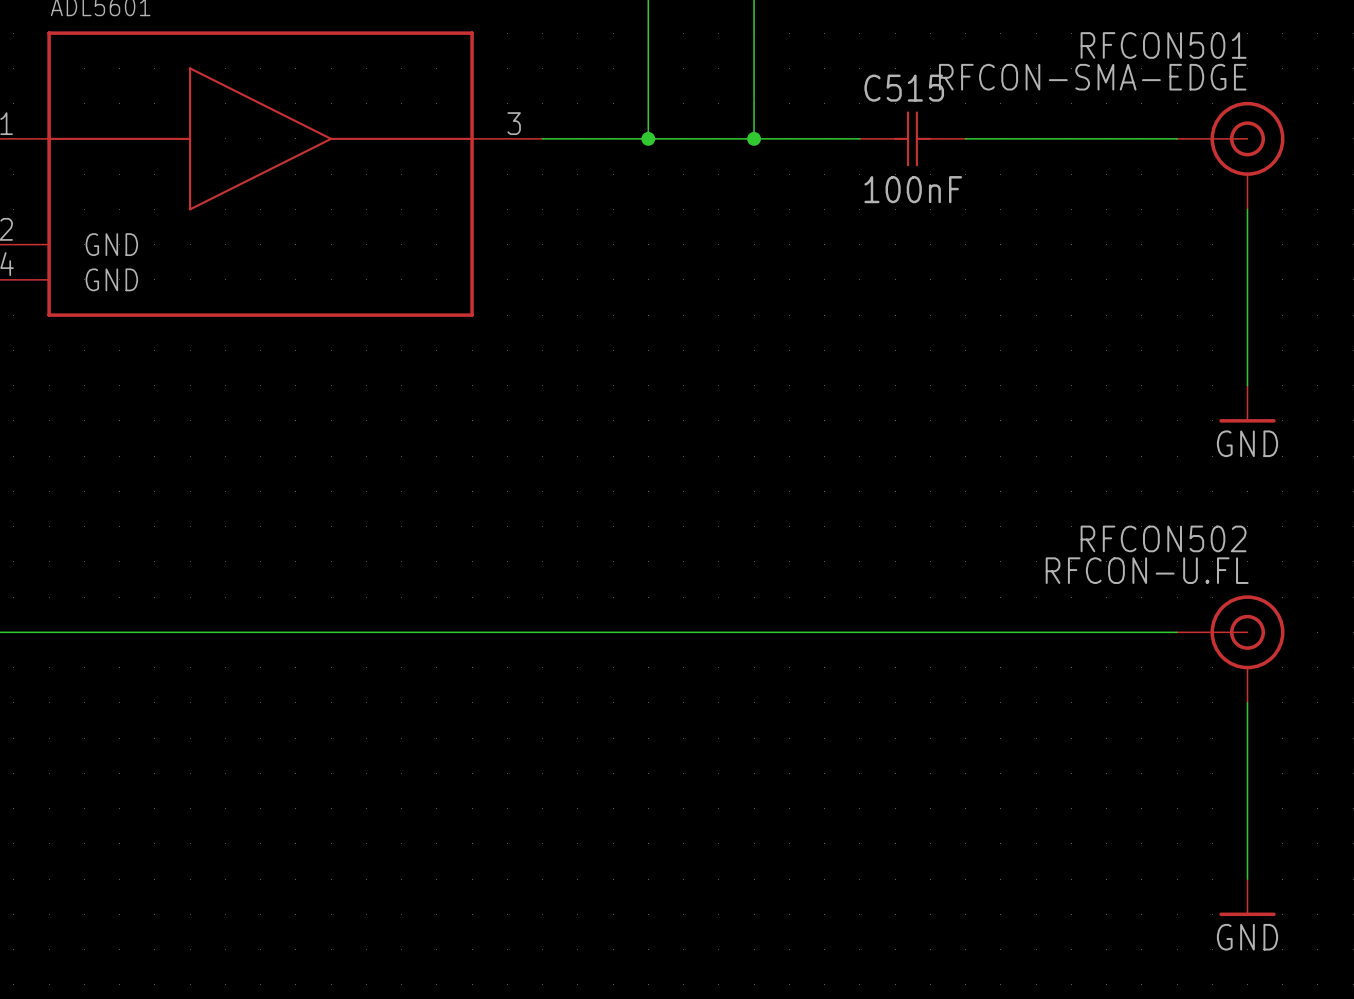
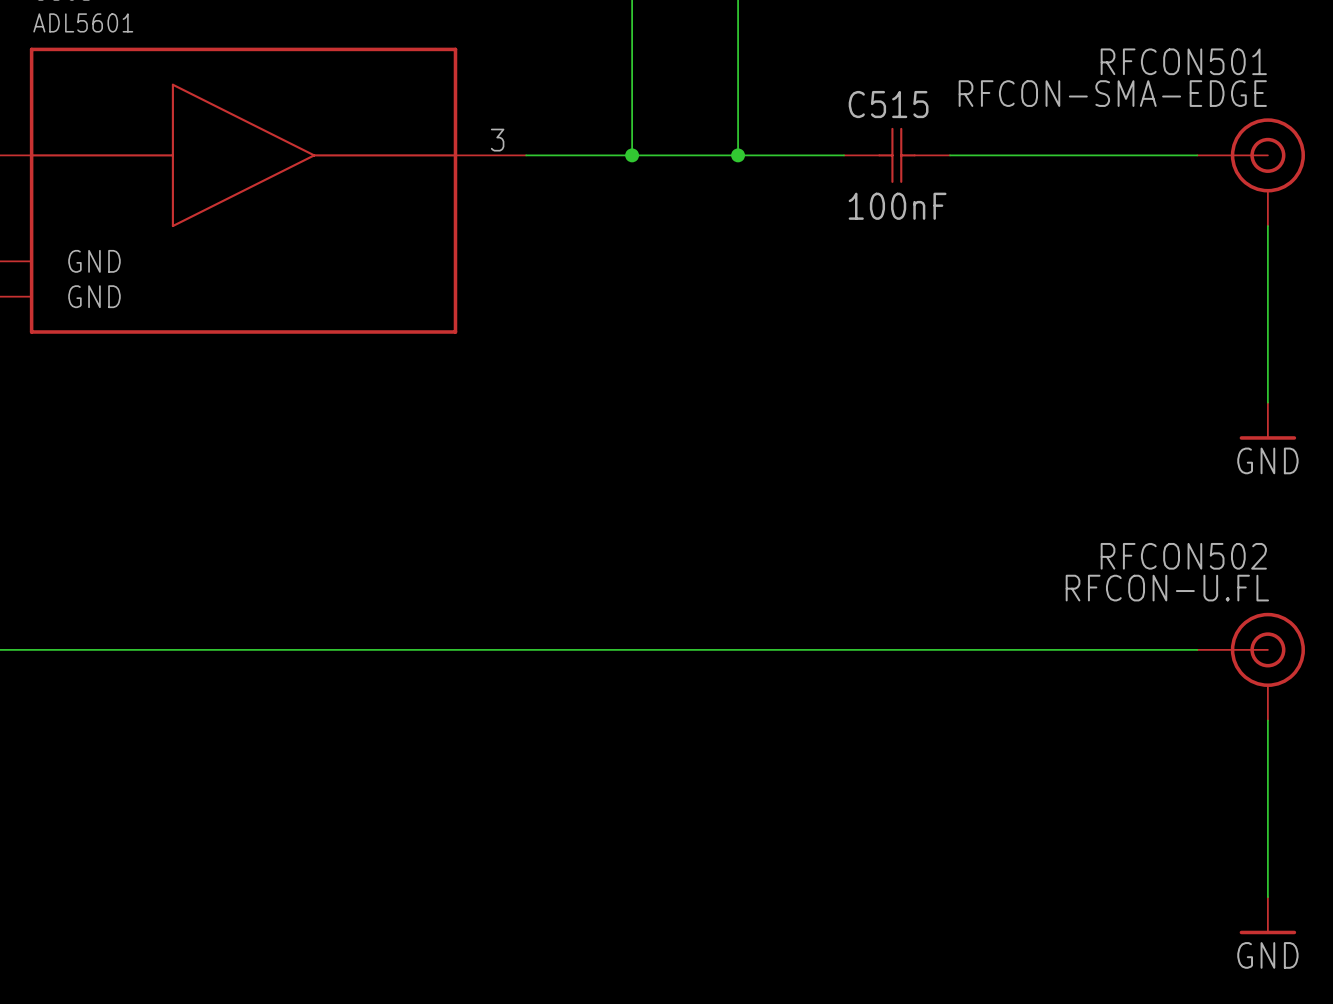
RFCON501 position: (1230, 155) -> (1251, 172)
wire: (1247, 209) (1247, 385) -> (1267, 226) (1267, 402)
power symbol position: GND (1247, 404) -> GND (1267, 421)
RFCON502 position: (1230, 649) -> (1251, 666)
wire: (1247, 702) (1247, 879) -> (1267, 720) (1267, 897)
power symbol position: GND (1247, 897) -> GND (1267, 915)

